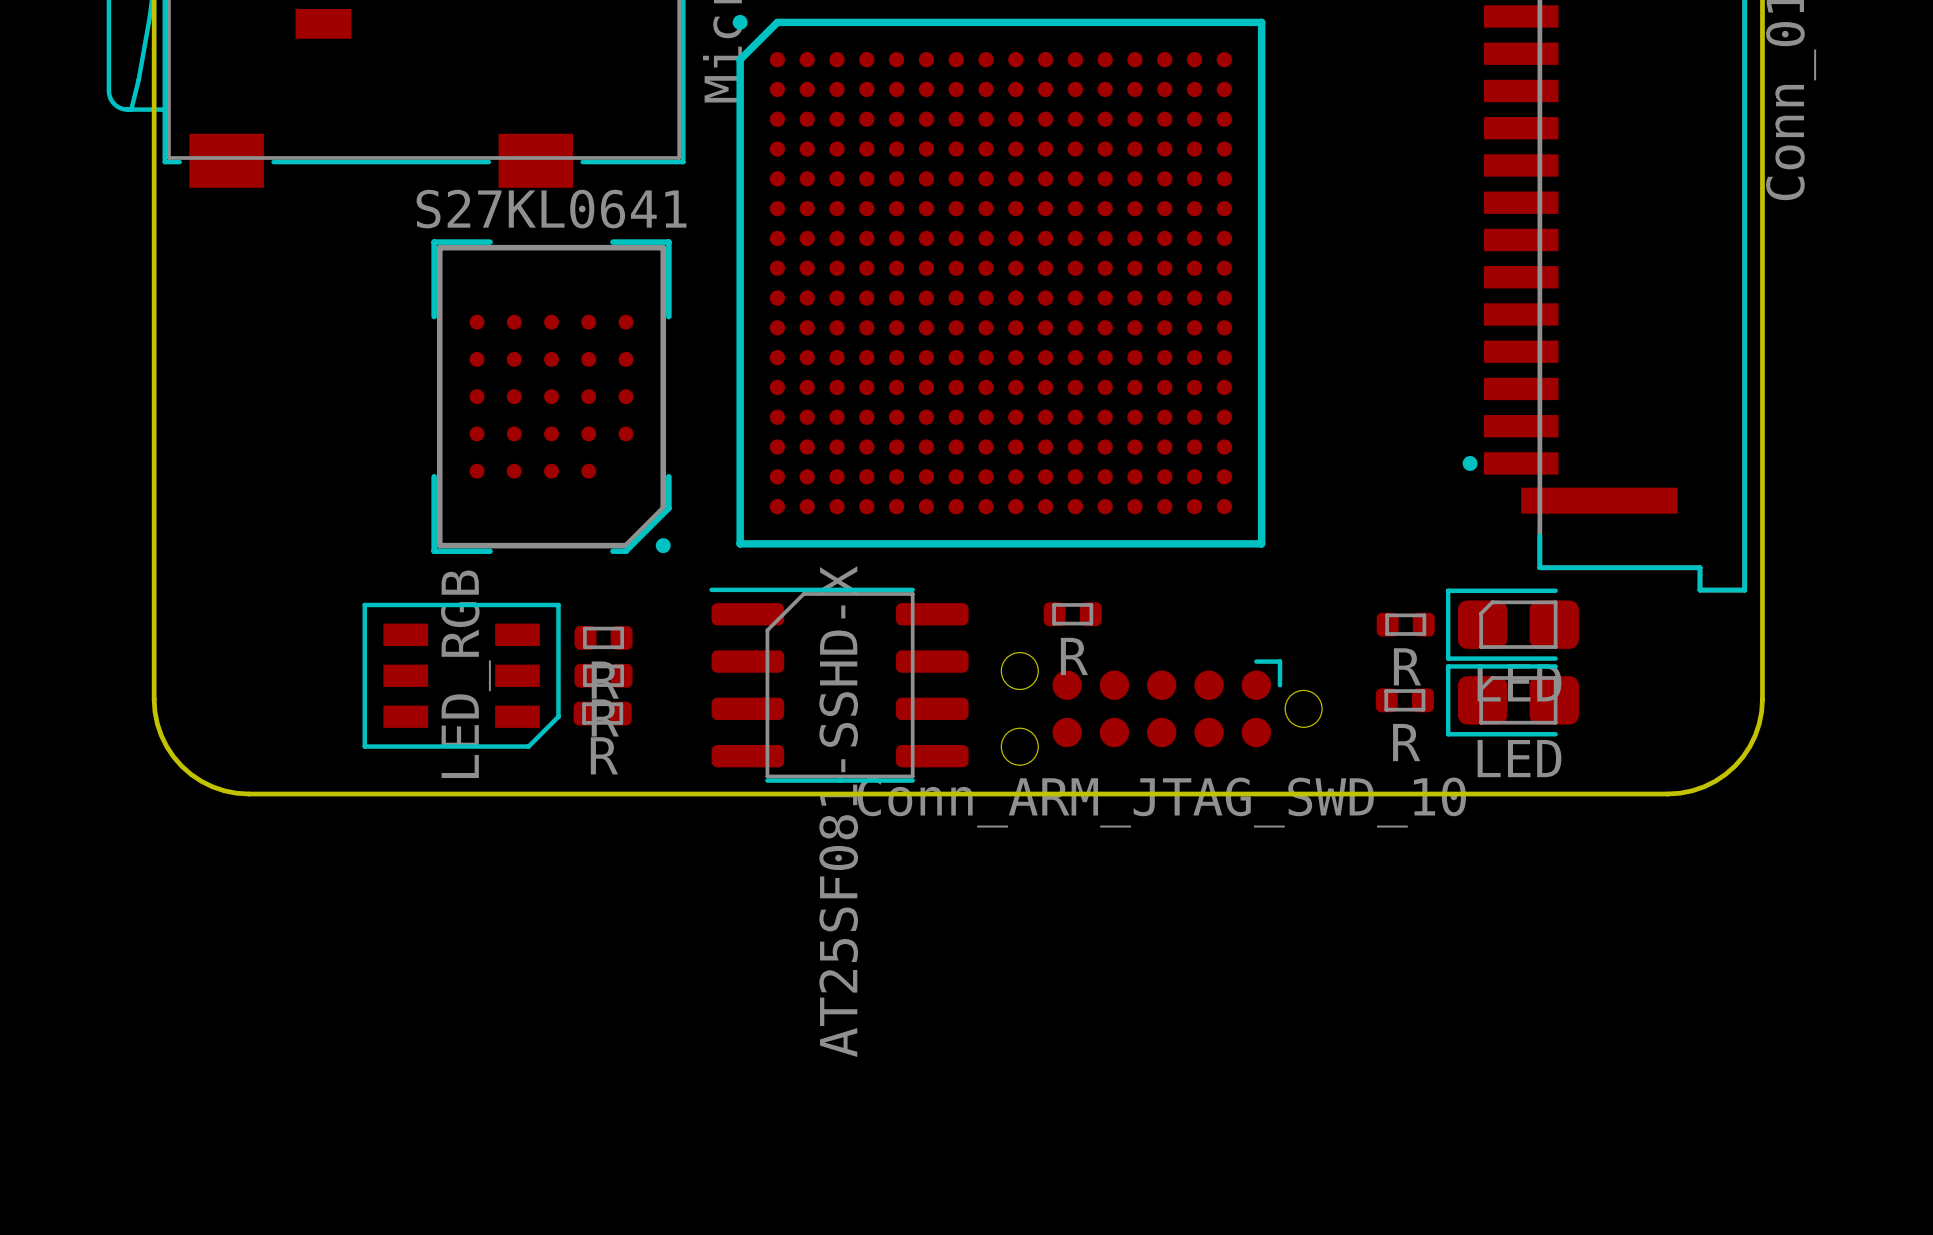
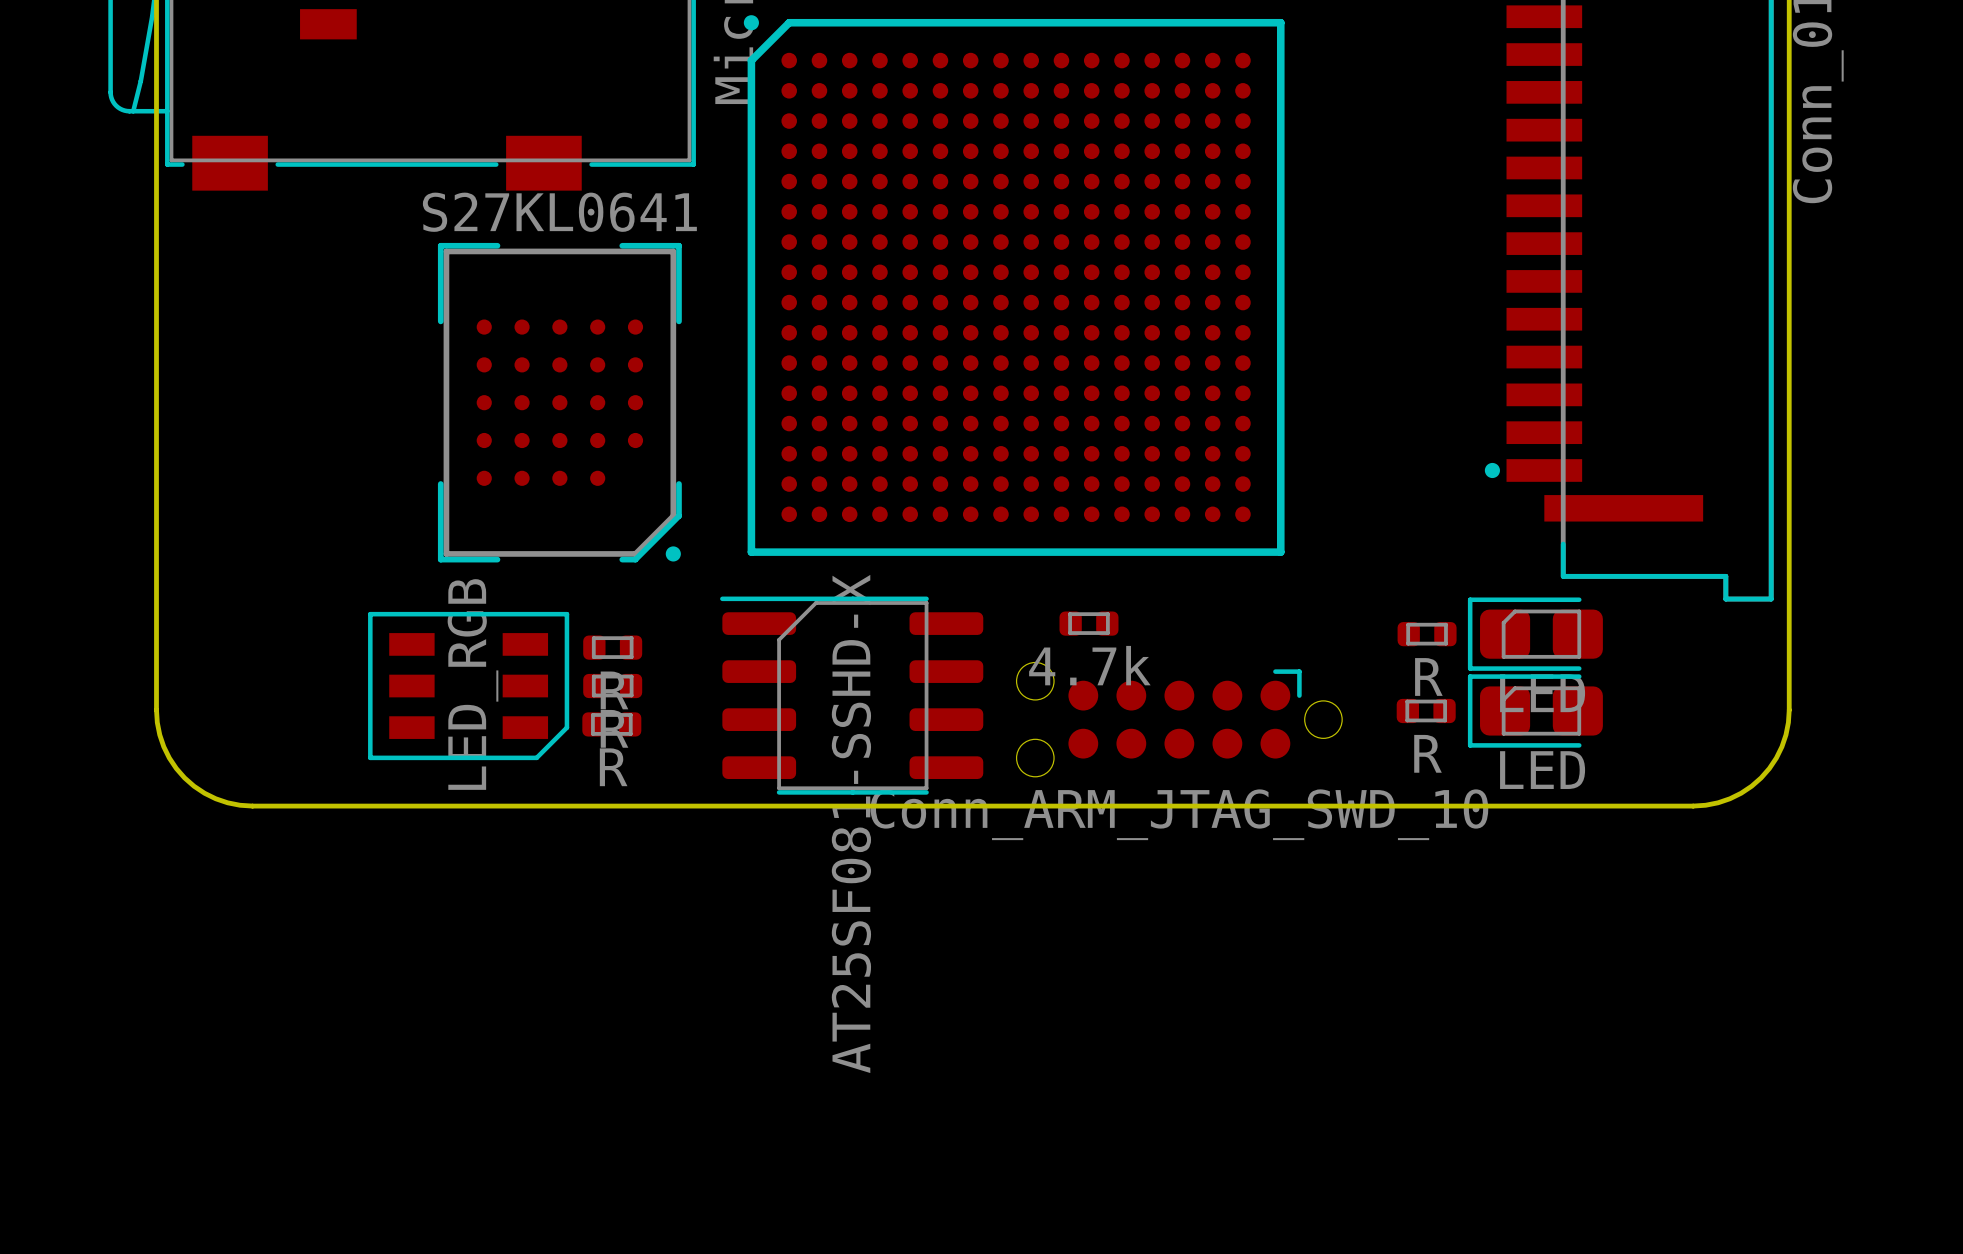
part value: R (1074, 656) -> 4.7k (1089, 665)

